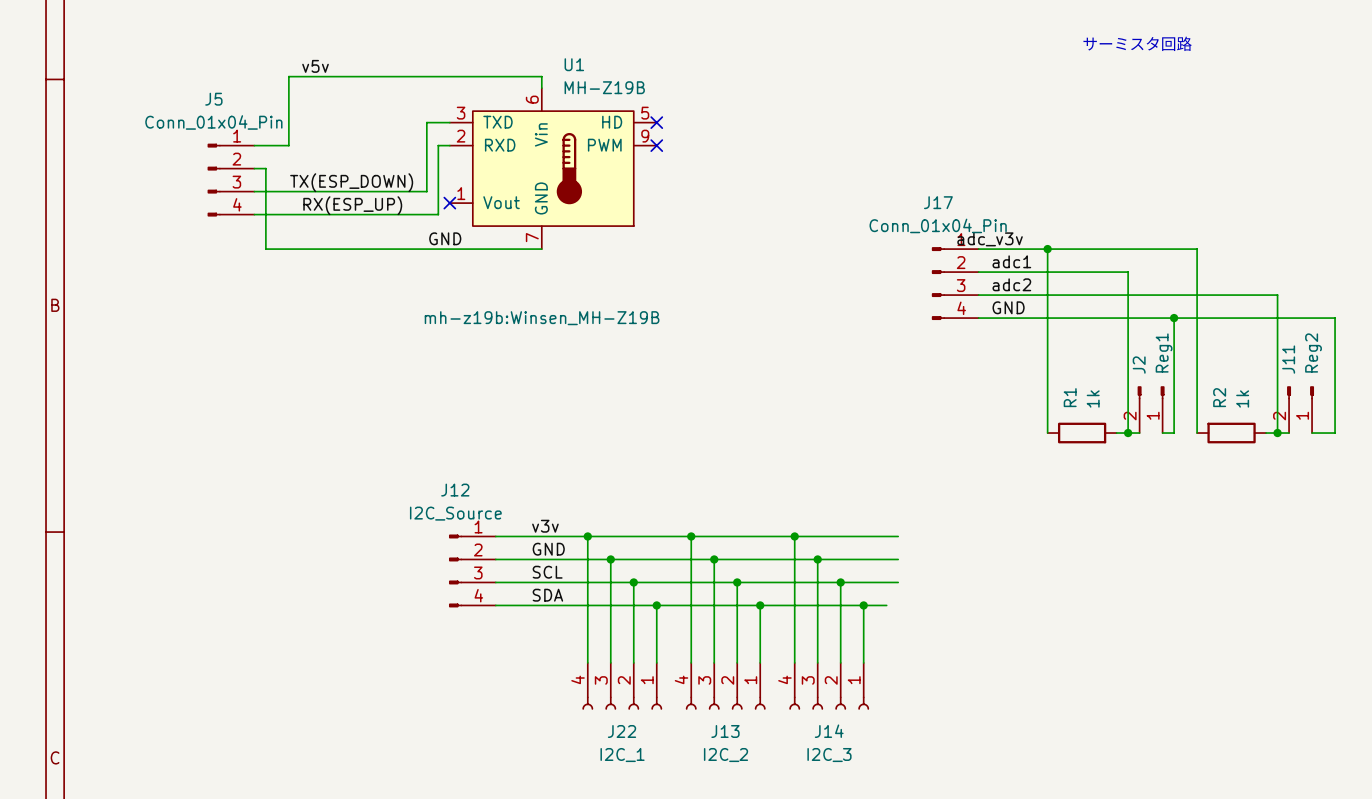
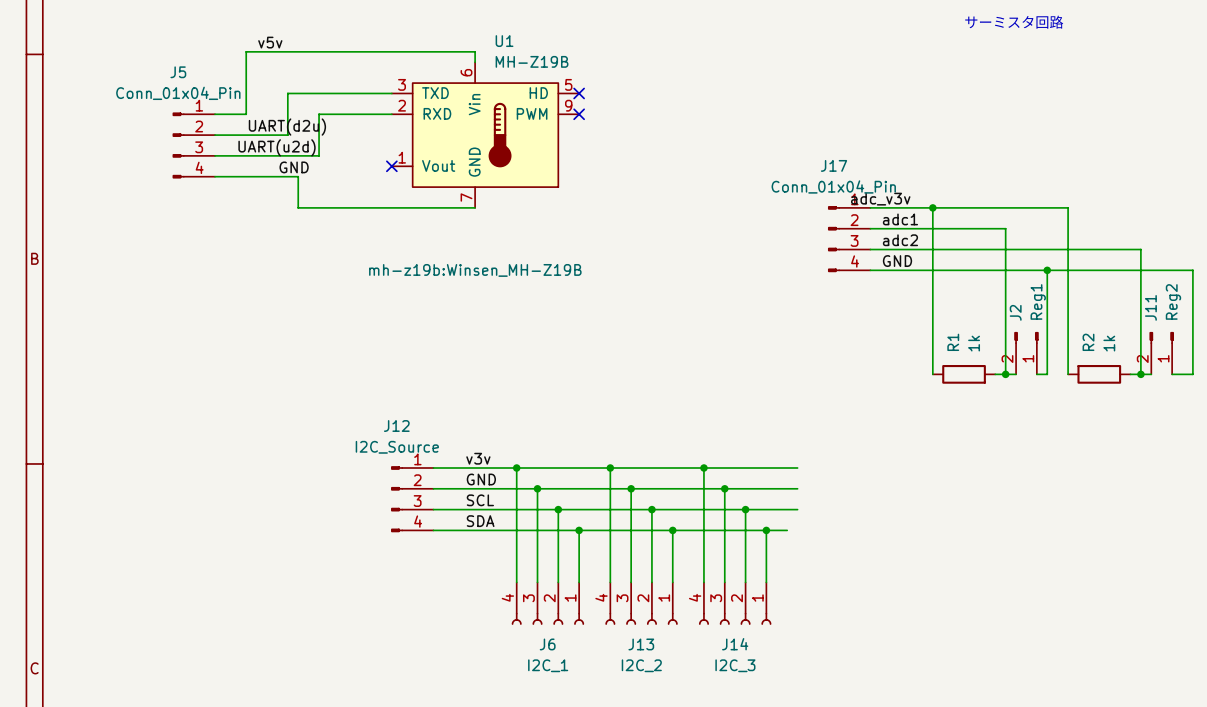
wire: (426, 122) (426, 191) (369, 191) -> (381, 114) (319, 114) (319, 155)
wire: none -> (371, 93) (287, 93) (287, 135) (225, 135)
wire: (438, 145) (438, 214) (346, 214) -> none
label: none -> UART(d2u) (287, 127)
wire: (265, 168) (265, 249) (346, 249) -> (298, 176) (298, 207)
label: none -> UART(u2d) (277, 147)
label: TX(ESP_DOWN) (351, 182) -> none
label: RX(ESP_UP) (352, 205) -> none
label position: GND (445, 238) -> GND (294, 167)
J22 name: J22 (622, 731) -> J6 (547, 644)

